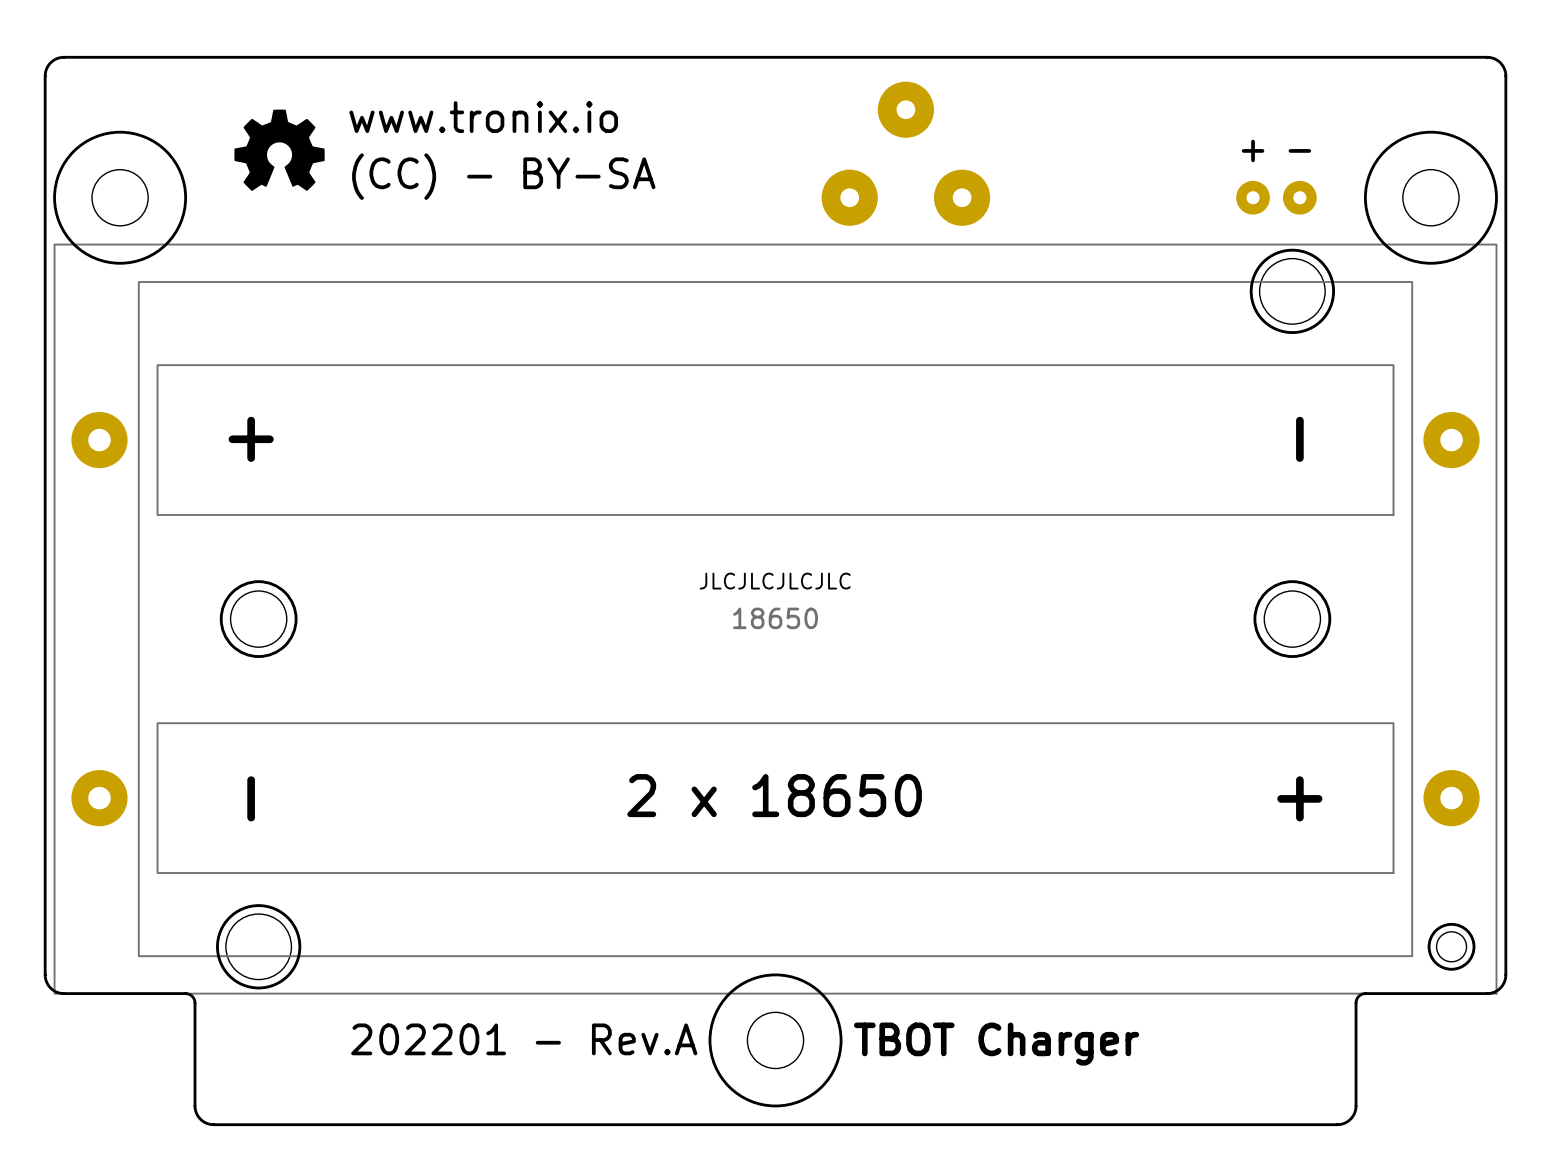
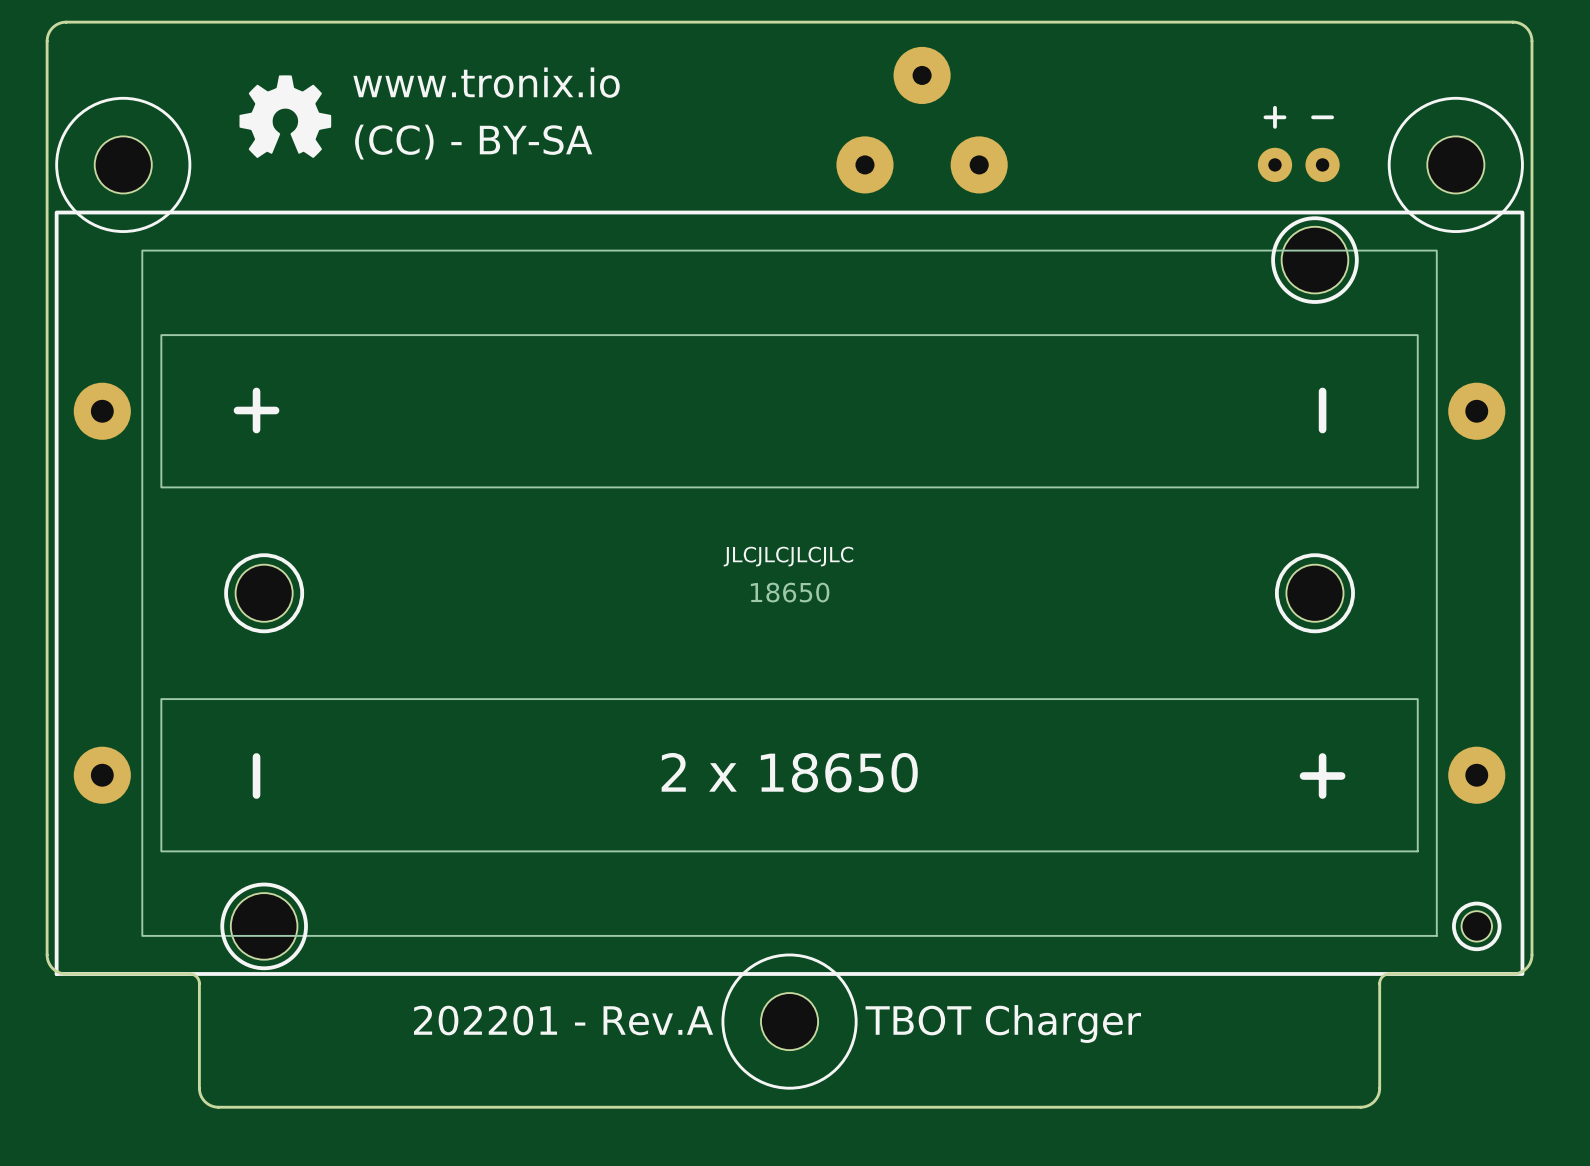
part footprint: [53, 243, 1498, 995] -> [54, 210, 1525, 976]

